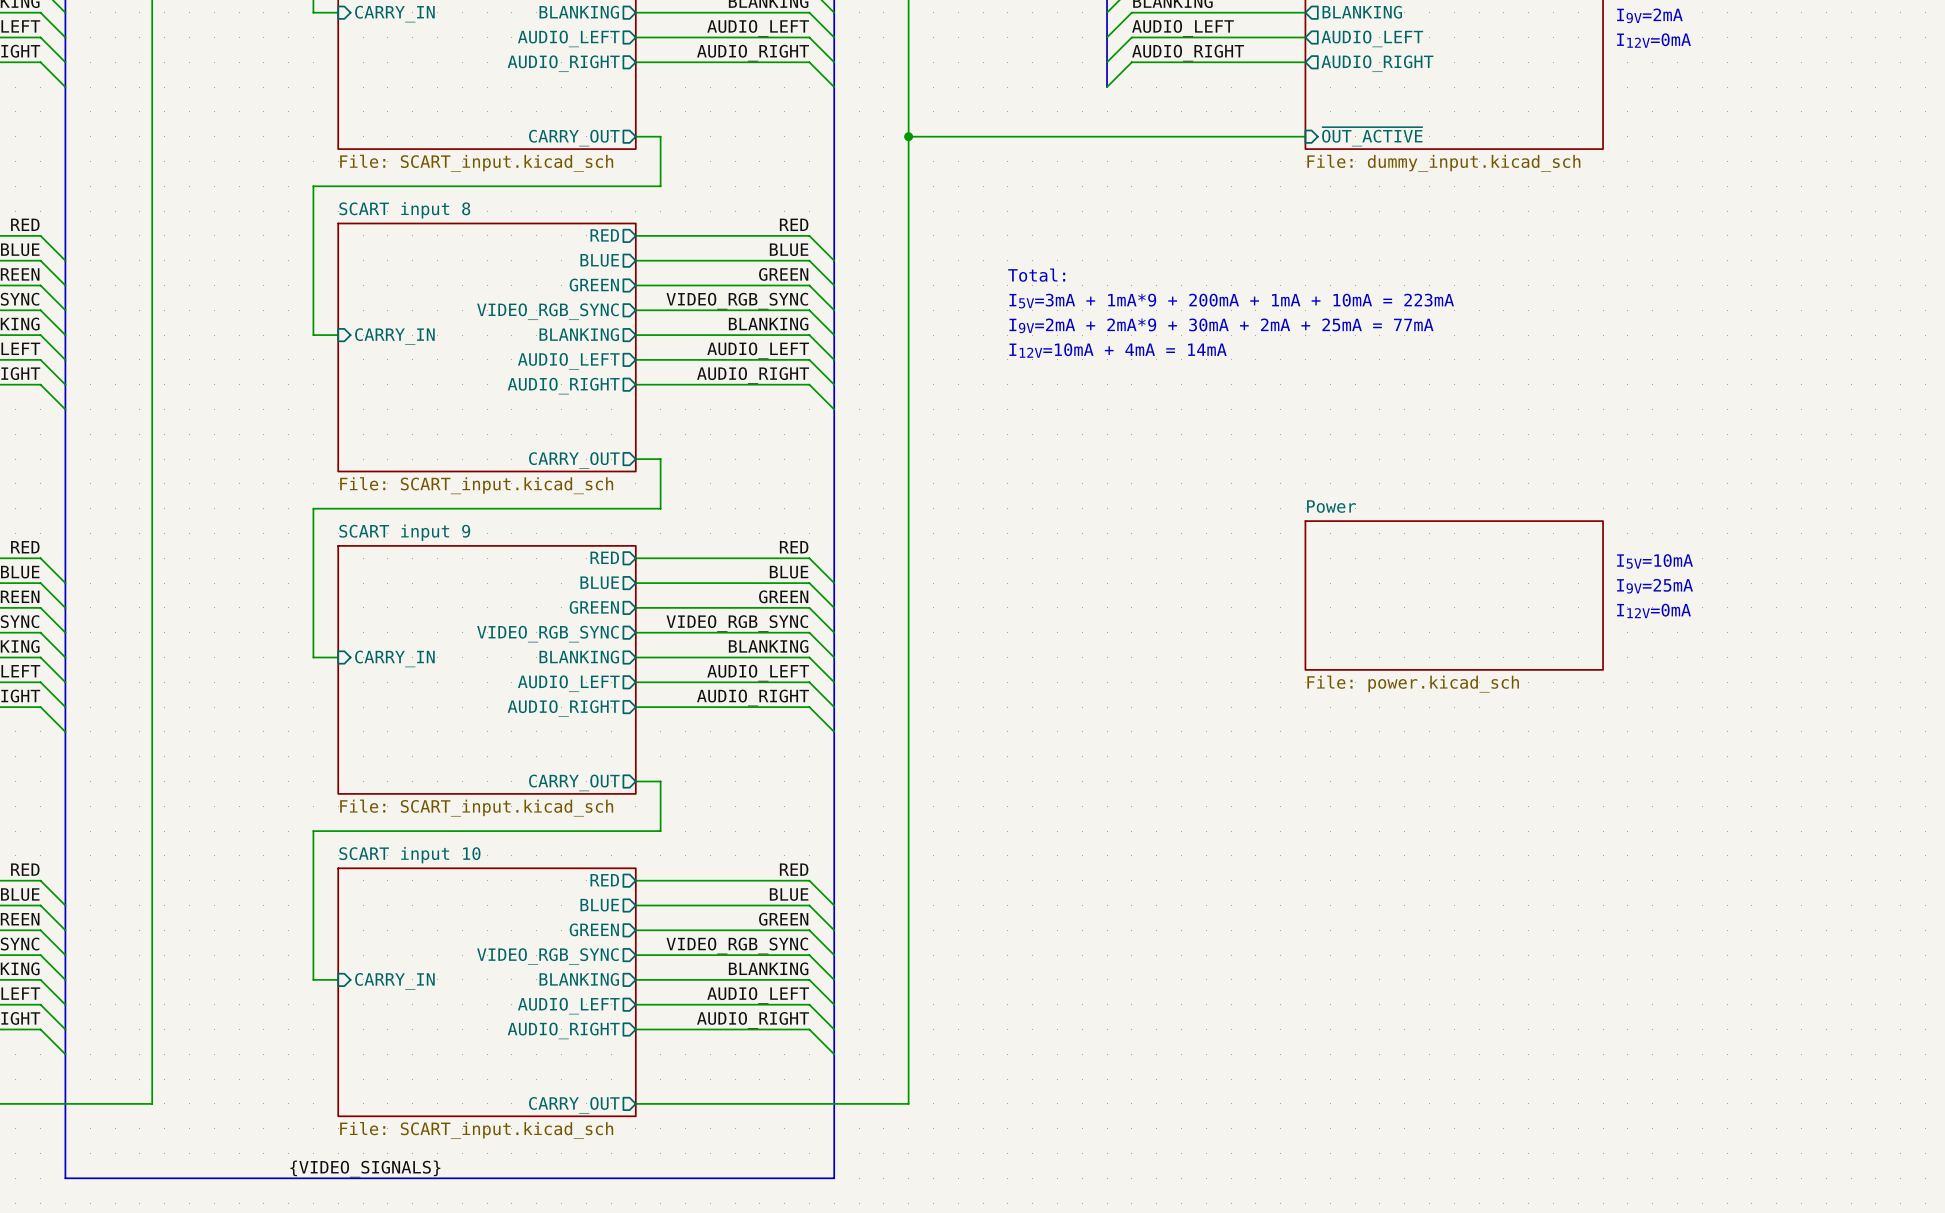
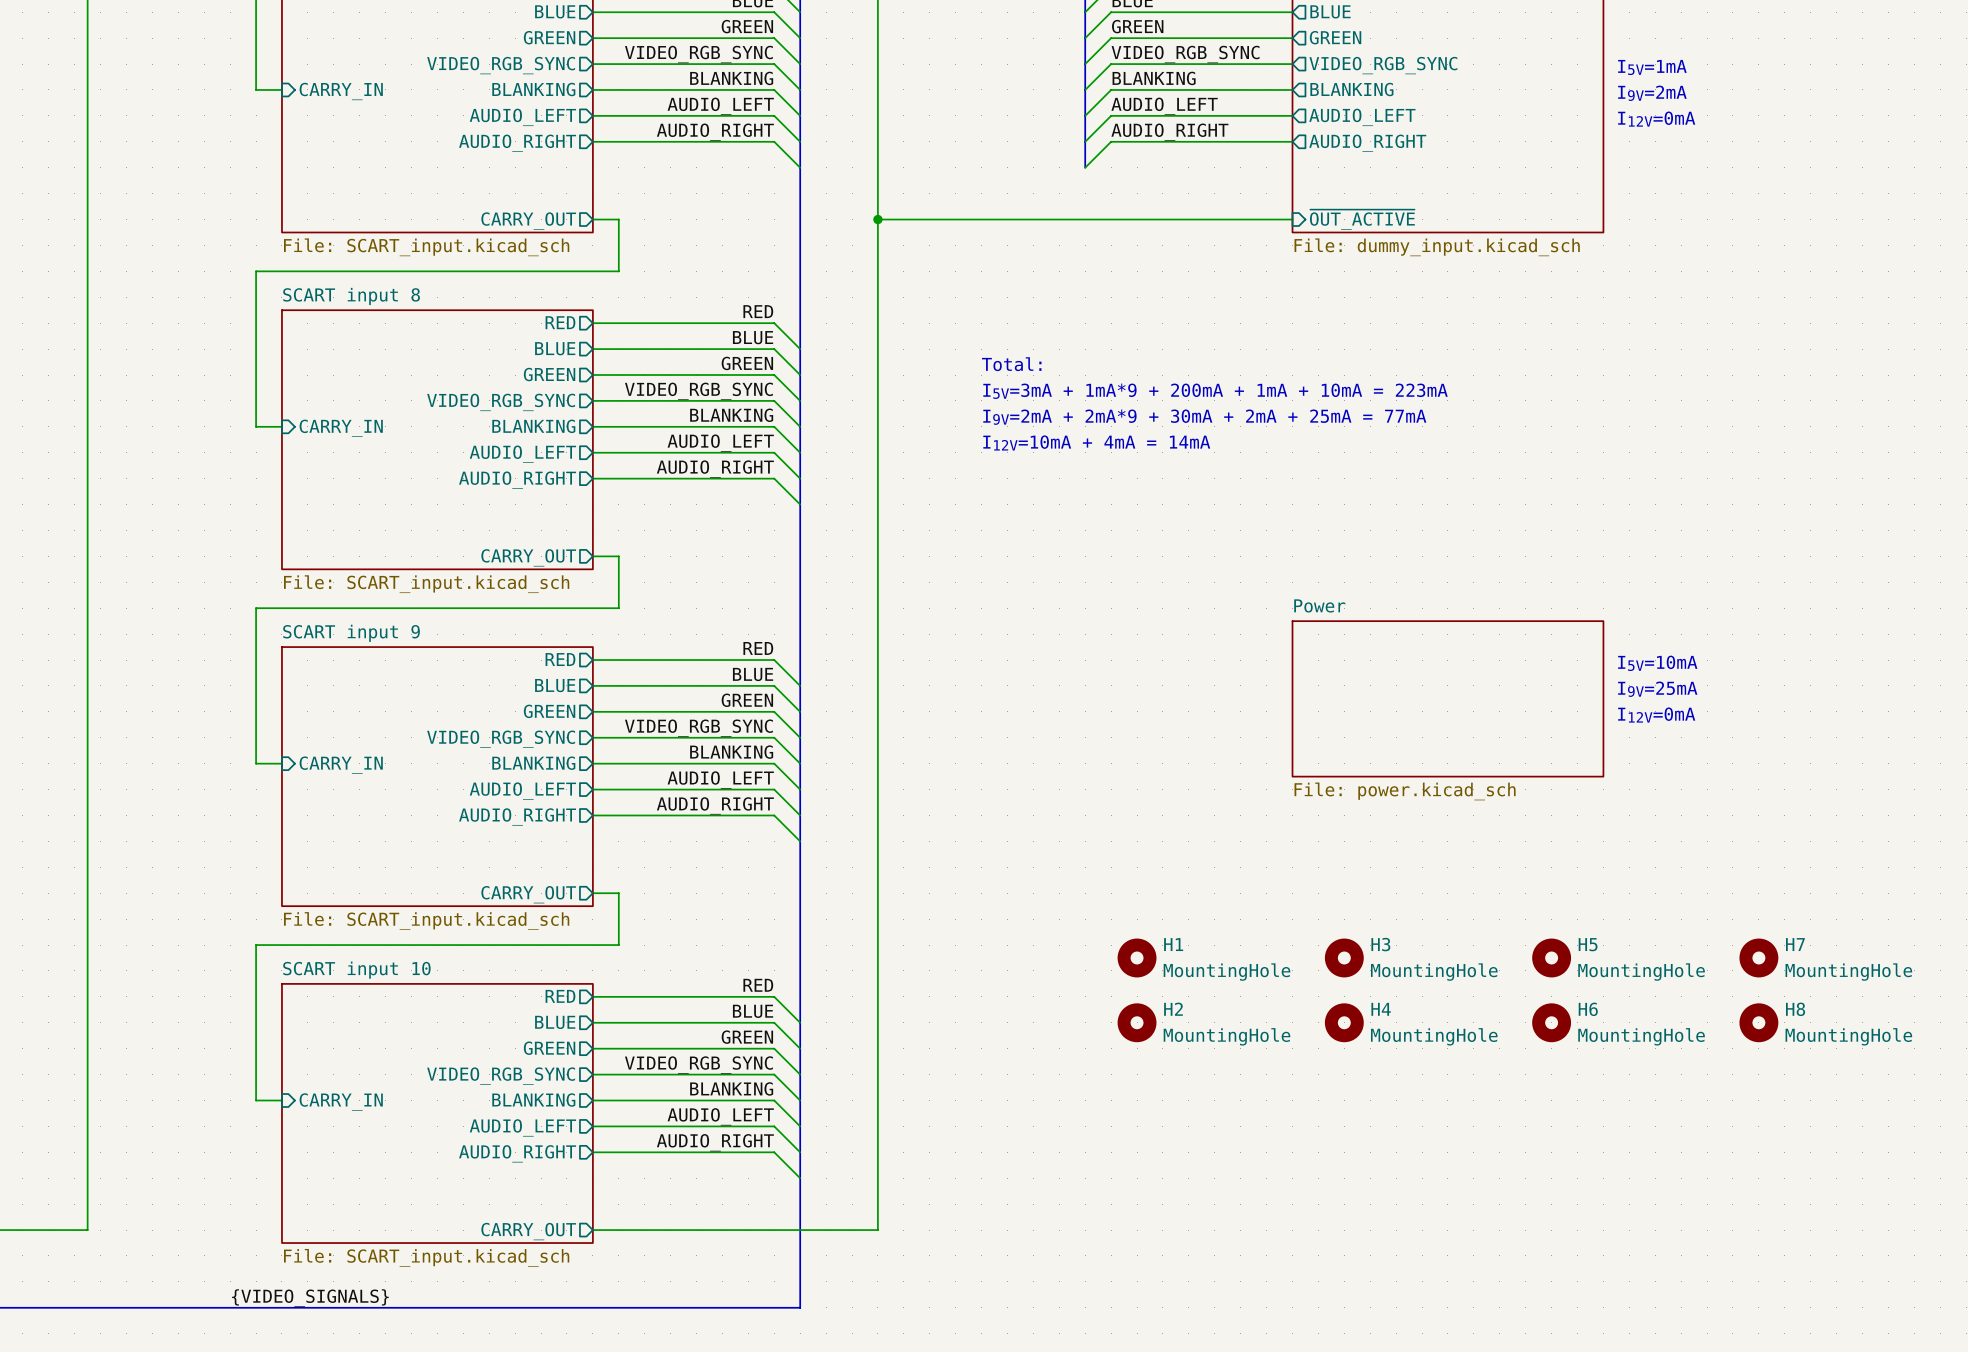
H1: none -> MountingHole (1137, 957)
H3: none -> MountingHole (1344, 957)
H5: none -> MountingHole (1551, 957)
H7: none -> MountingHole (1758, 957)
H2: none -> MountingHole (1137, 1022)
H4: none -> MountingHole (1344, 1022)
H6: none -> MountingHole (1551, 1022)
H8: none -> MountingHole (1758, 1022)

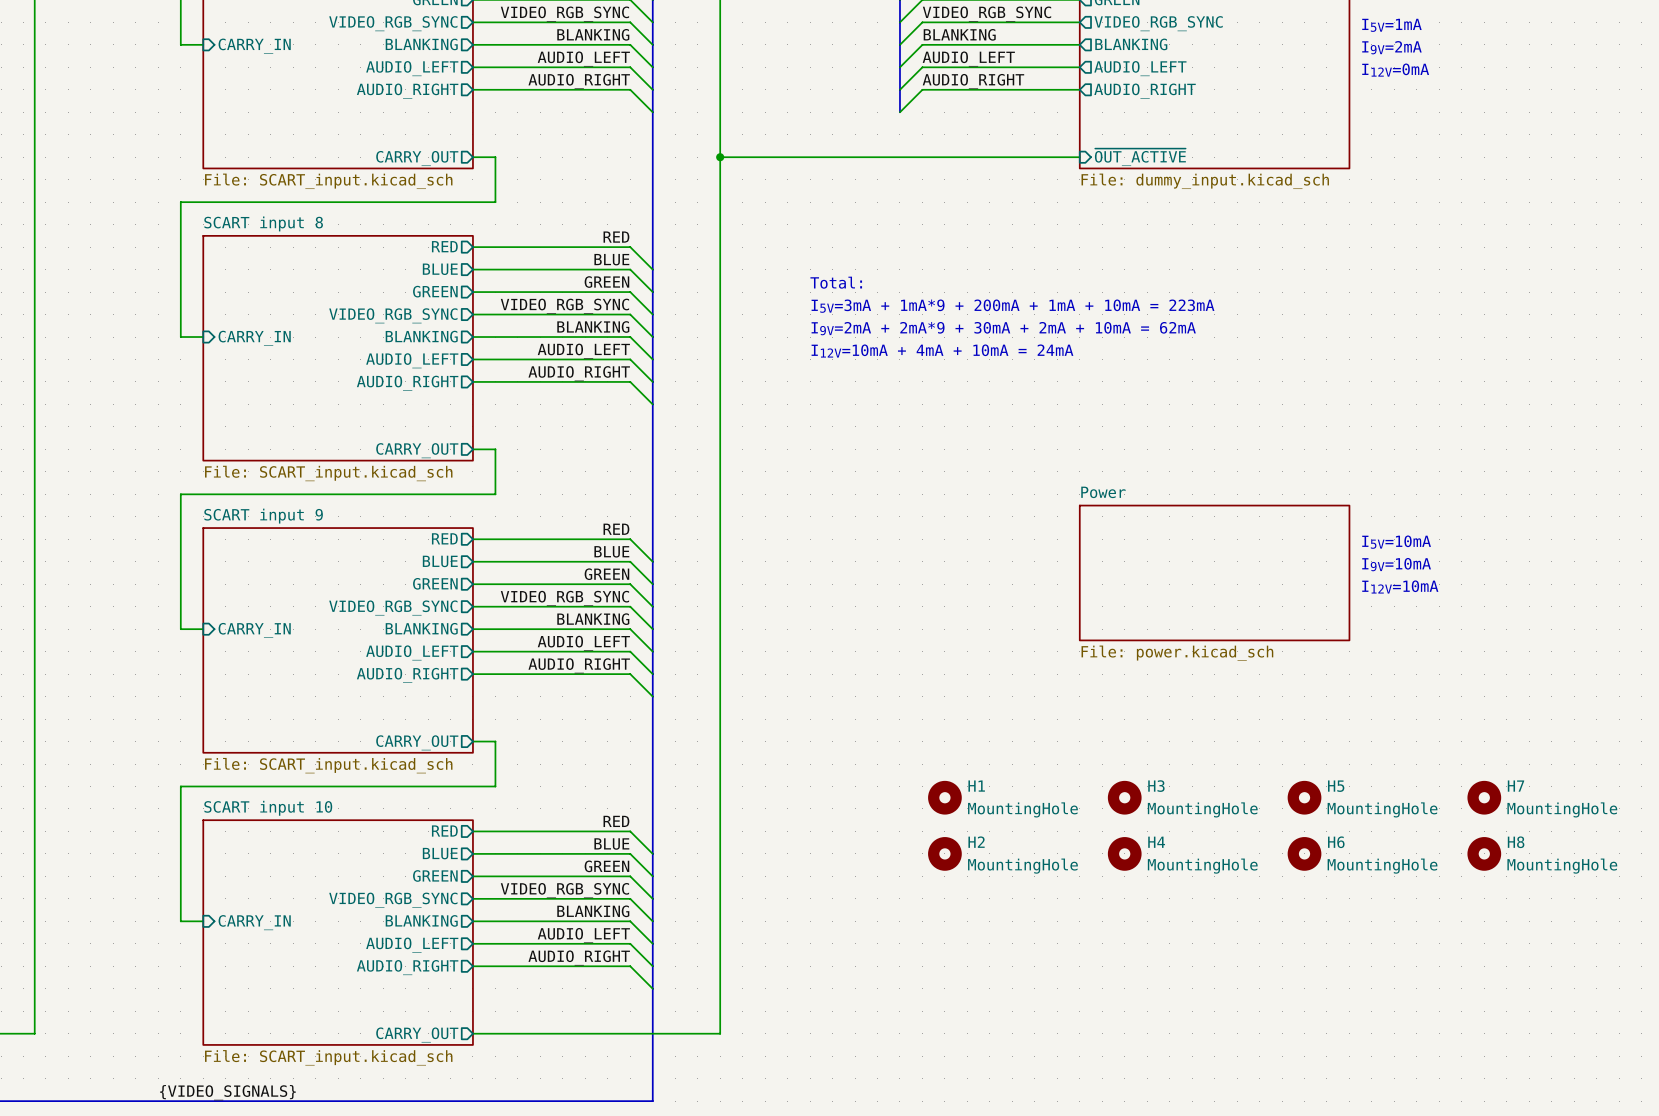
text: I9V=2mA + 2mA*9 + 30mA + 2mA + 25mA = 77mA (1204, 417) -> I9V=2mA + 2mA*9 + 30mA + 2mA + 10mA = 62mA (1003, 328)
text: I12V=10mA + 4mA = 14mA (1096, 442) -> I12V=10mA + 4mA + 10mA = 24mA (942, 351)
text: I9V=25mA (1657, 689) -> I9V=10mA (1396, 564)
text: I12V=0mA (1656, 715) -> I12V=10mA (1400, 586)

